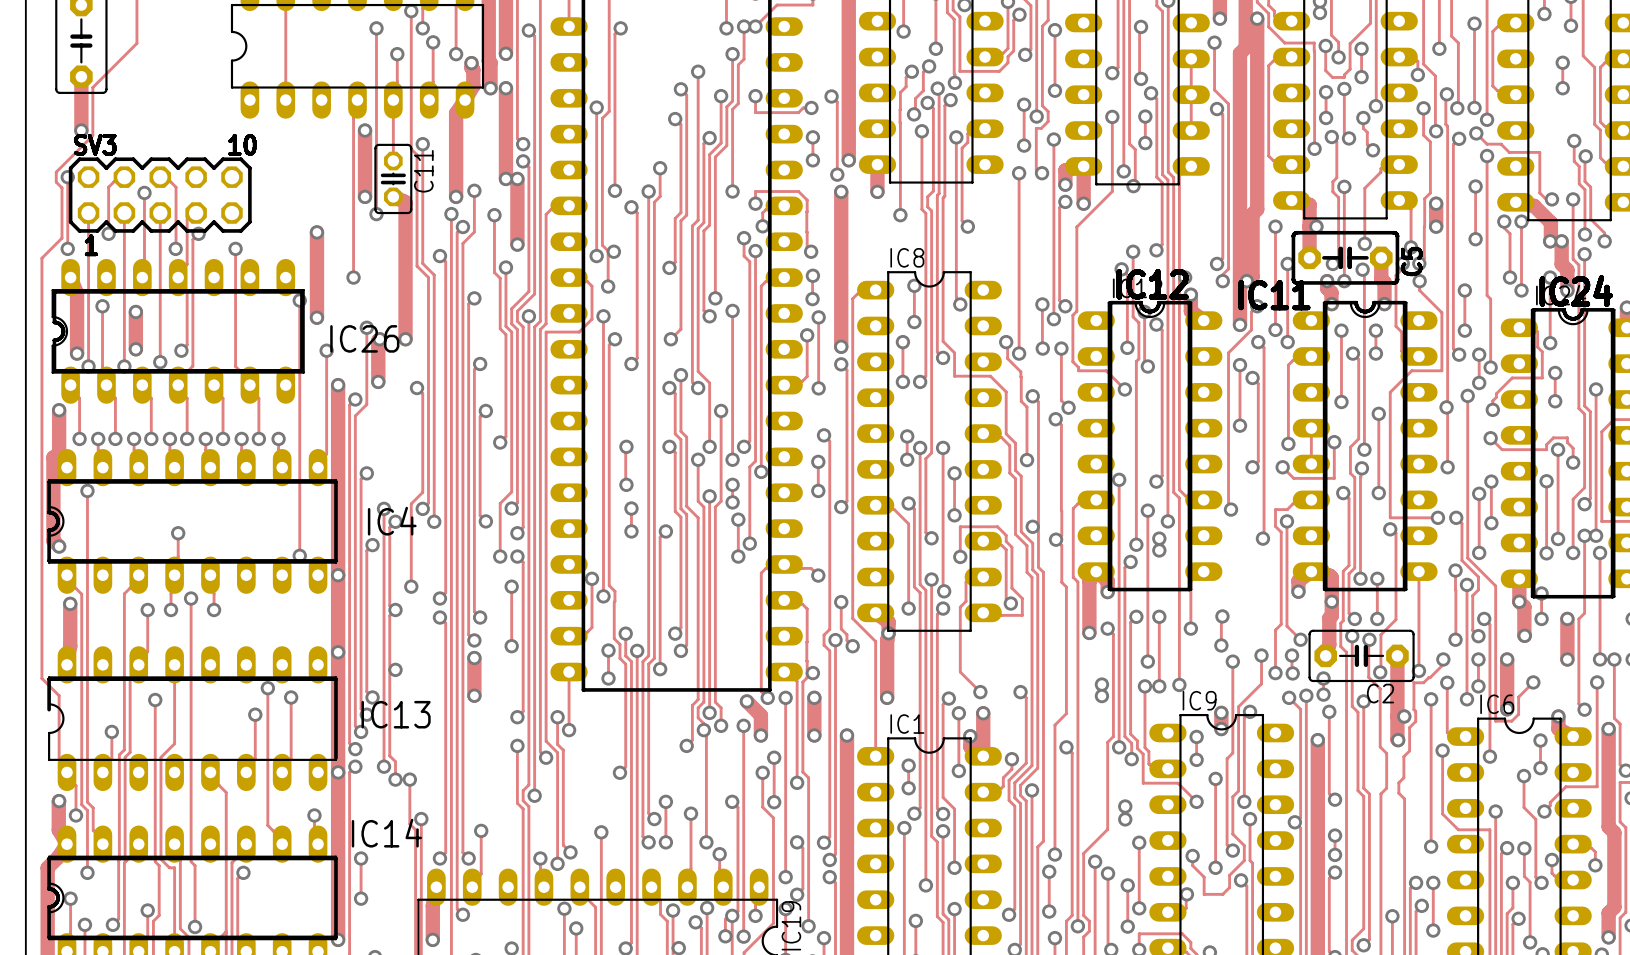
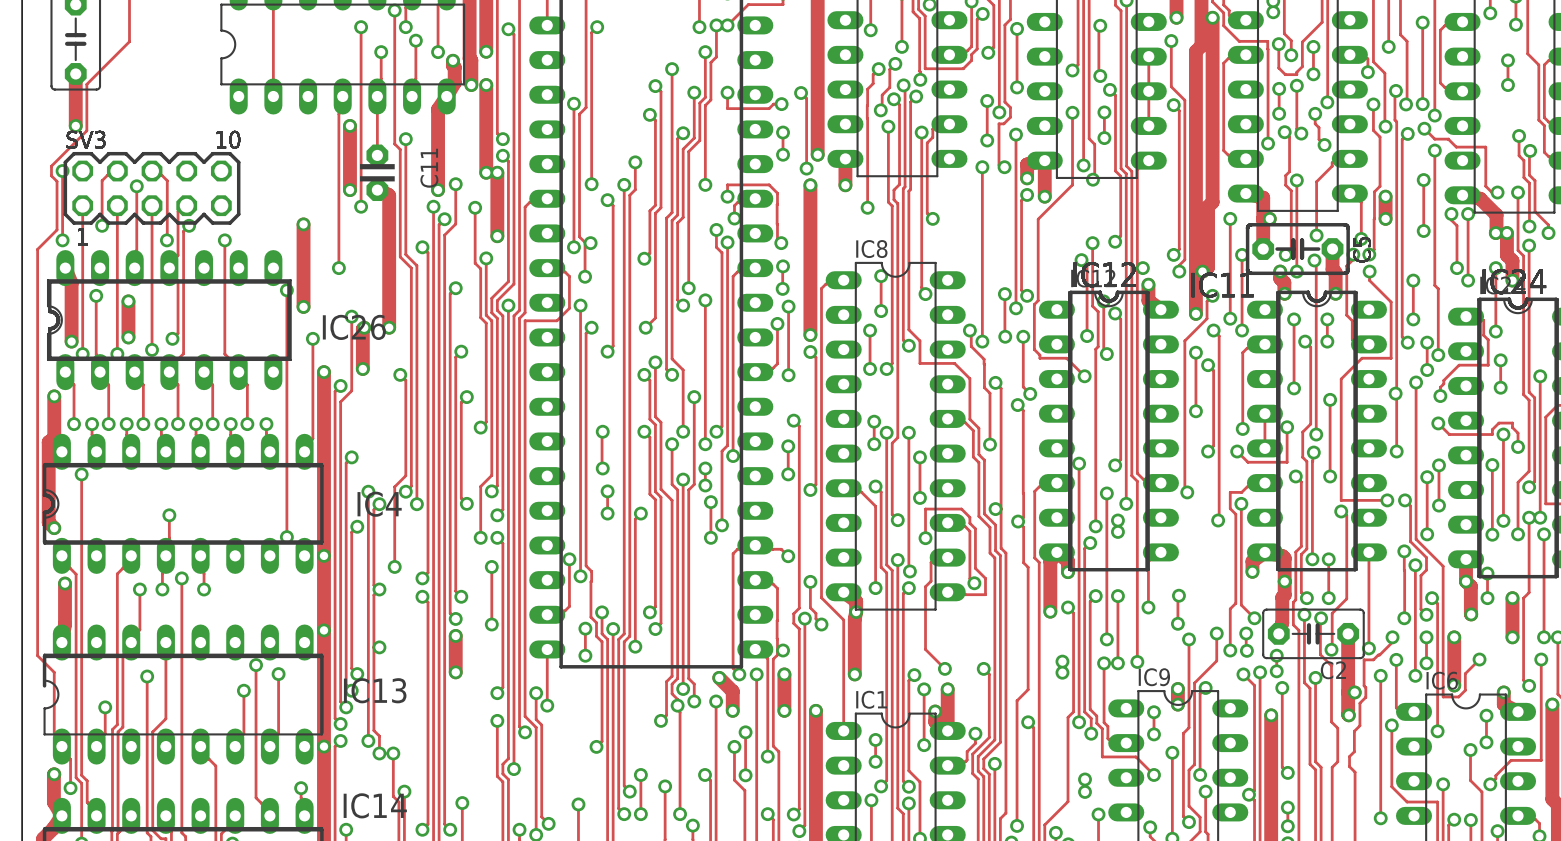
C11 footprint: [374, 143, 413, 215] -> [360, 144, 395, 202]

